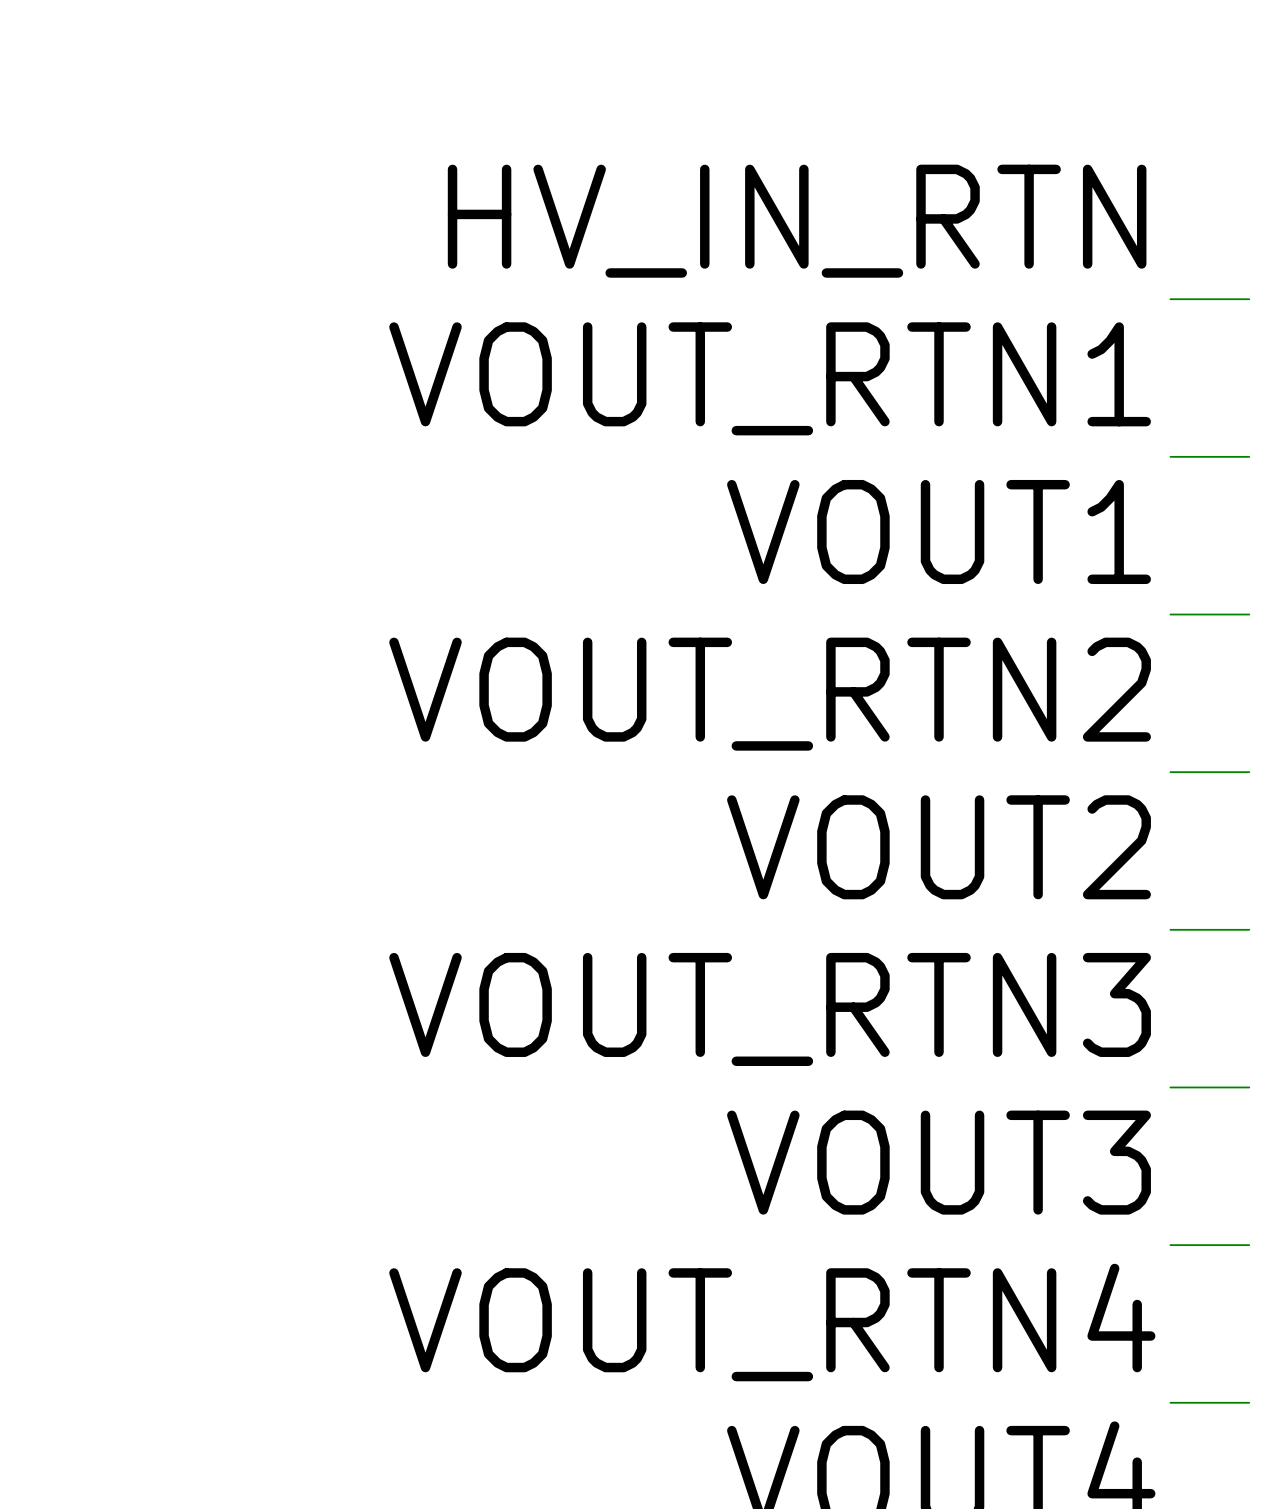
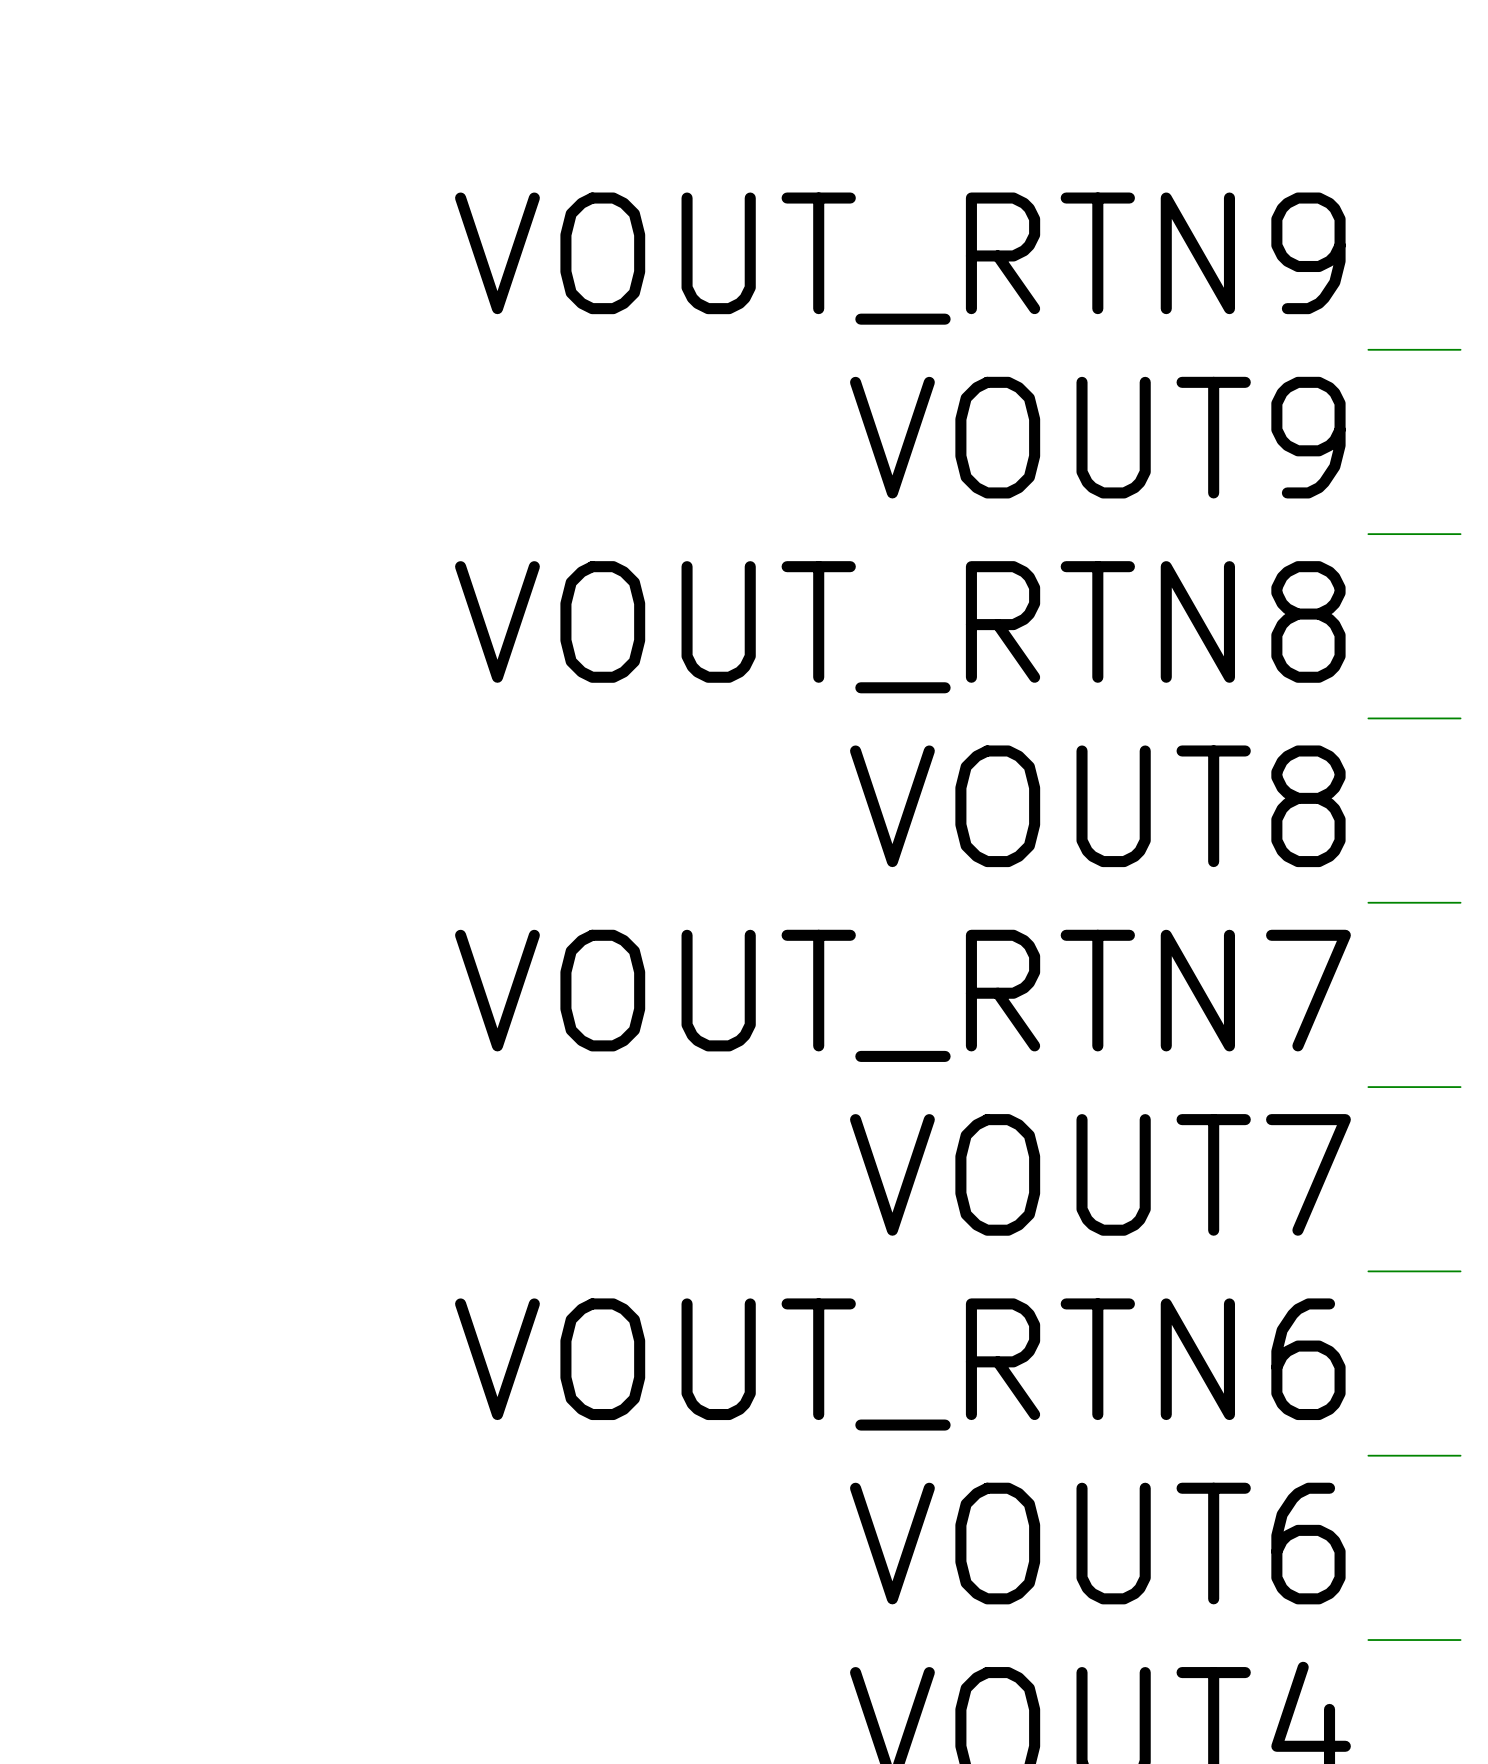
label: HV_IN_RTN (797, 221) -> VOUT_RTN9 (900, 258)
label: VOUT_RTN1 (770, 378) -> VOUT9 (1097, 437)
label: VOUT1 (939, 531) -> VOUT_RTN8 (900, 627)
label: VOUT_RTN2 (770, 694) -> VOUT8 (1097, 806)
label: VOUT2 (939, 847) -> VOUT_RTN7 (902, 995)
label: VOUT_RTN3 (770, 1009) -> VOUT7 (1100, 1174)
label: VOUT3 (939, 1162) -> VOUT_RTN6 (900, 1364)
label: VOUT_RTN4 (772, 1322) -> VOUT6 (1097, 1543)

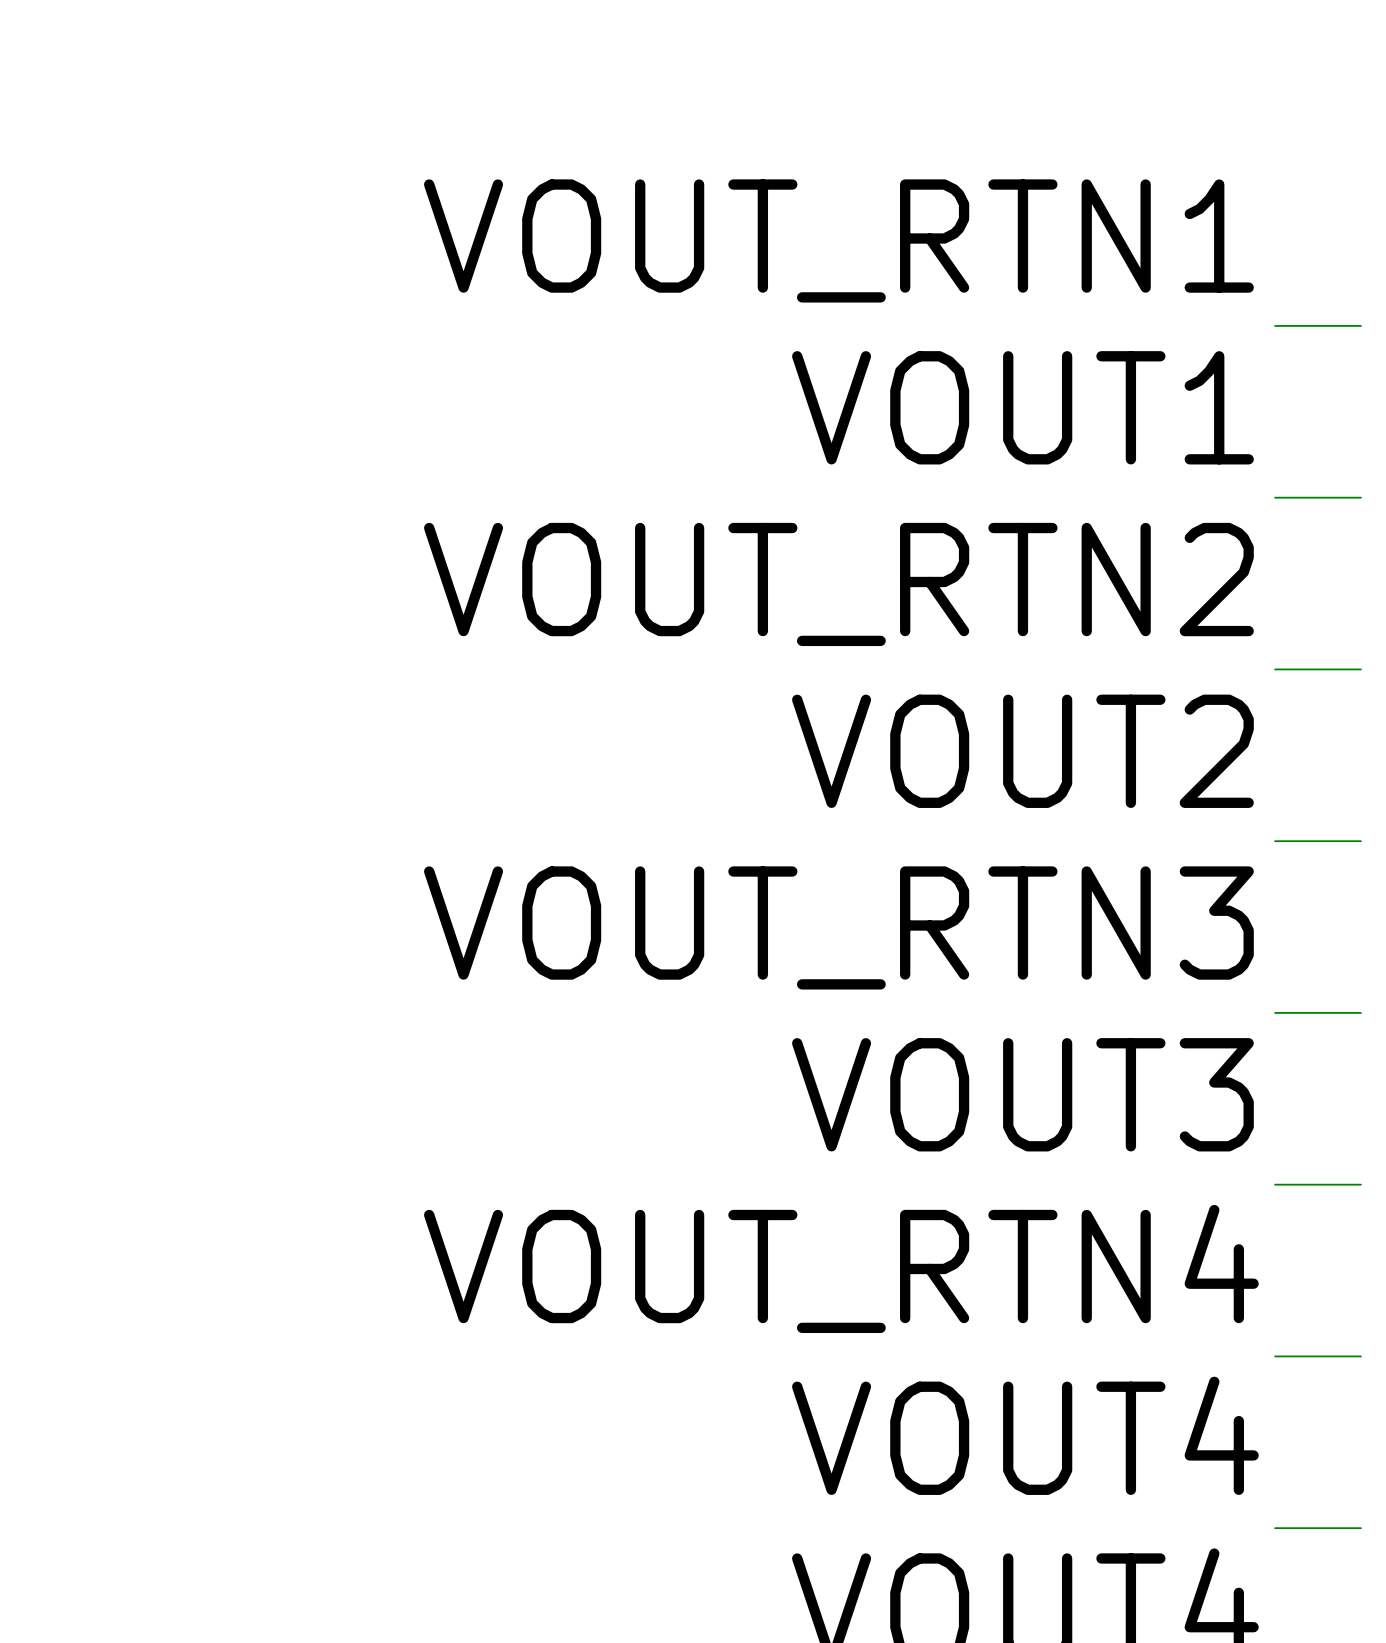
label: VOUT_RTN9 (900, 258) -> VOUT_RTN1 (838, 240)
label: VOUT9 (1097, 437) -> VOUT1 (1022, 407)
label: VOUT_RTN8 (900, 627) -> VOUT_RTN2 (838, 584)
label: VOUT8 (1097, 806) -> VOUT2 (1022, 751)
label: VOUT_RTN7 (902, 995) -> VOUT_RTN3 (838, 927)
label: VOUT7 (1100, 1174) -> VOUT3 (1022, 1094)
label: VOUT_RTN6 (900, 1364) -> VOUT_RTN4 (841, 1268)
label: VOUT6 (1097, 1543) -> VOUT4 (1025, 1435)

